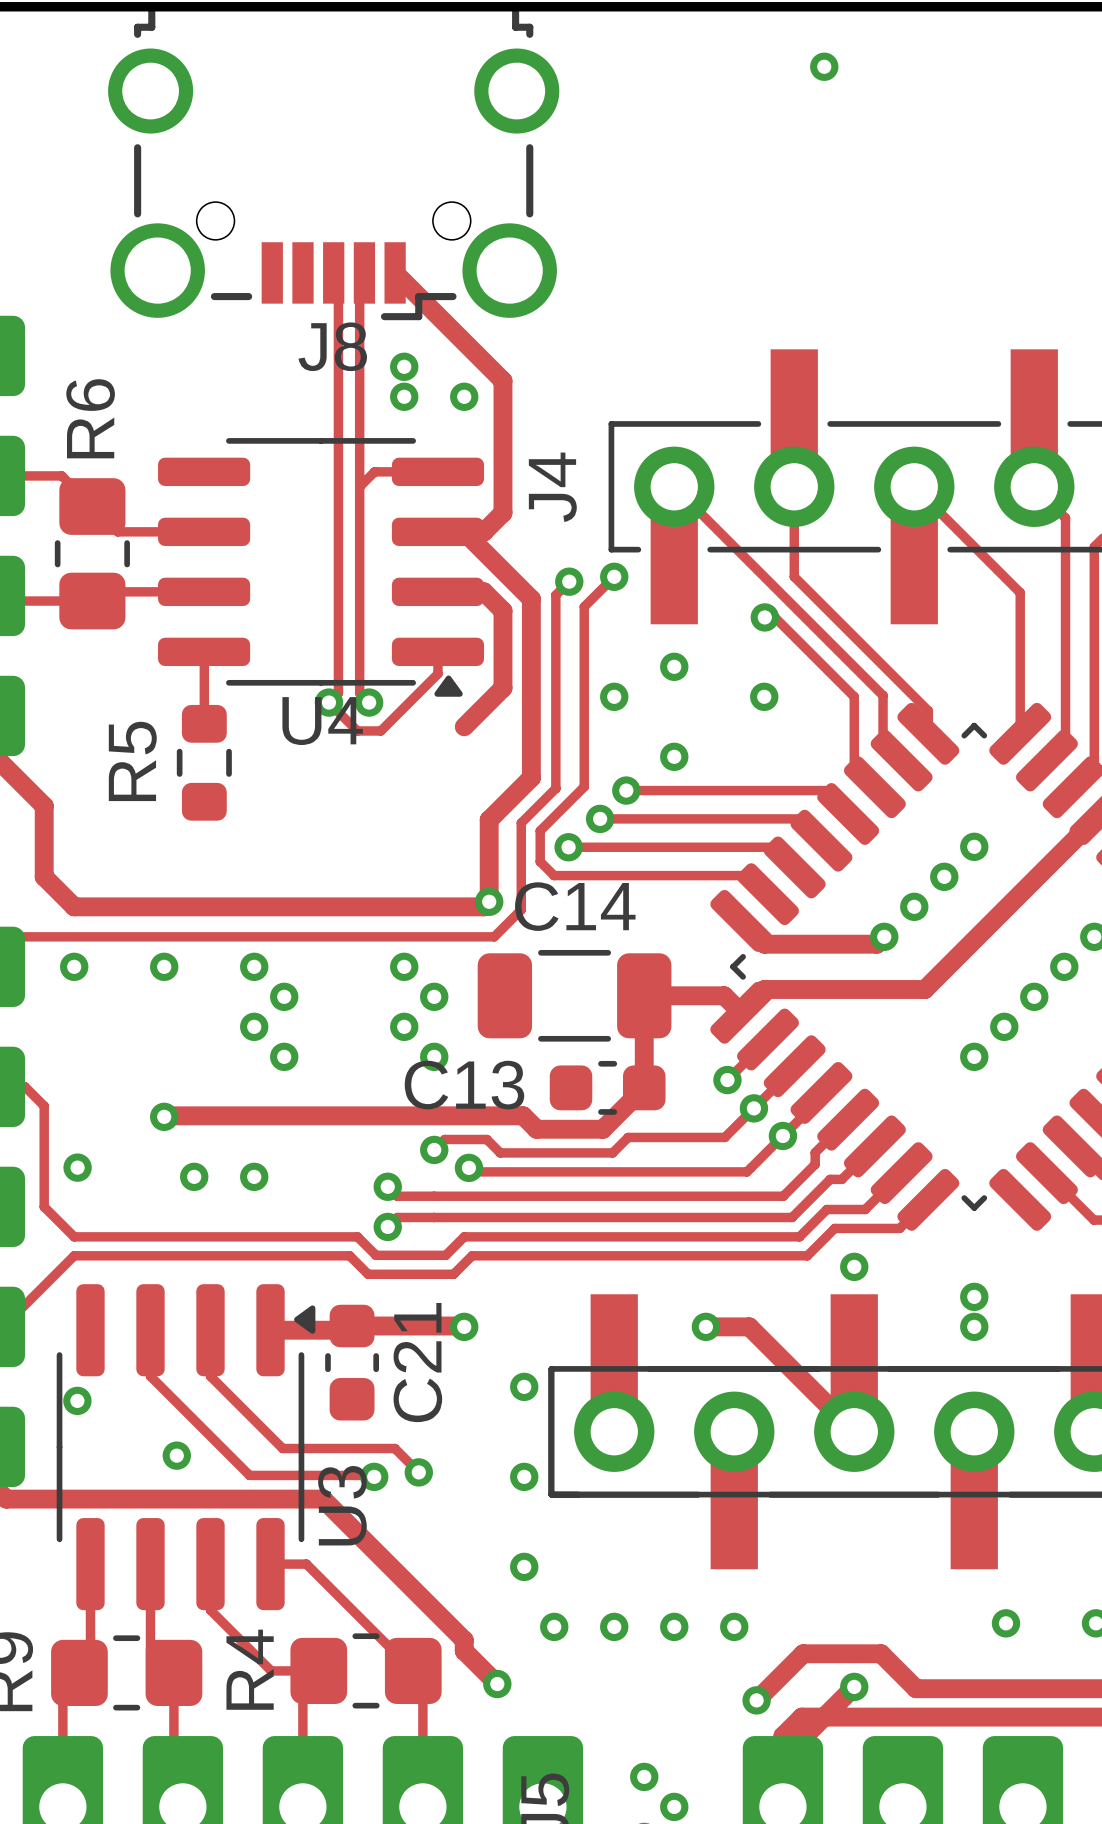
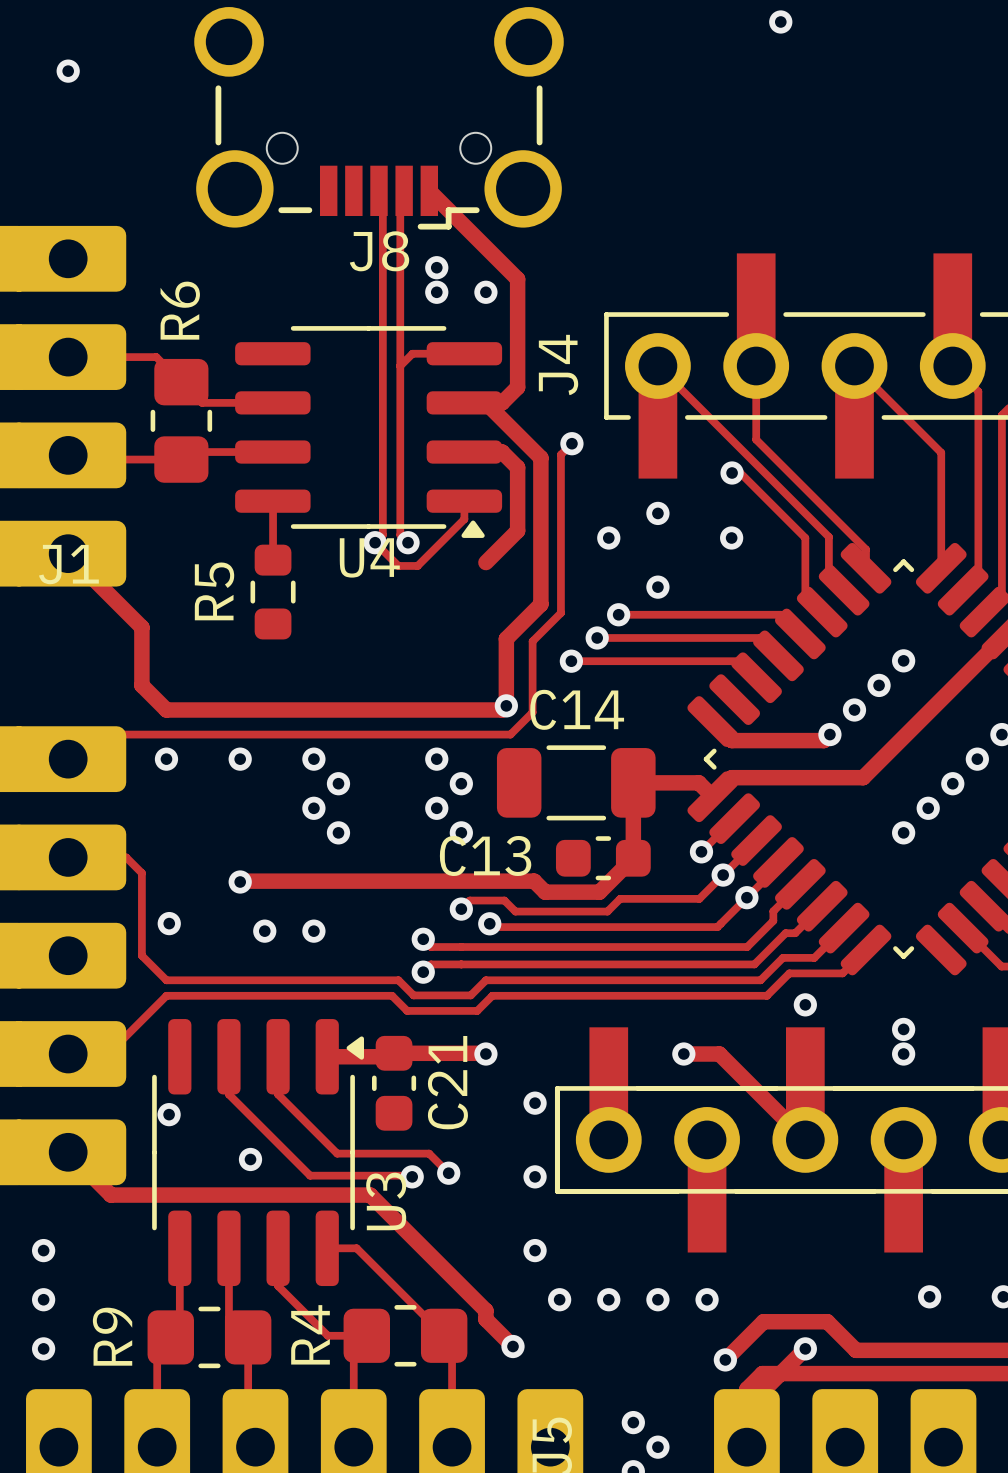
track: (614, 576) (584, 606) (584, 786) (540, 830) (540, 861) (554, 875) (749, 875) (767, 894) -> none
via: (614, 576) -> none

